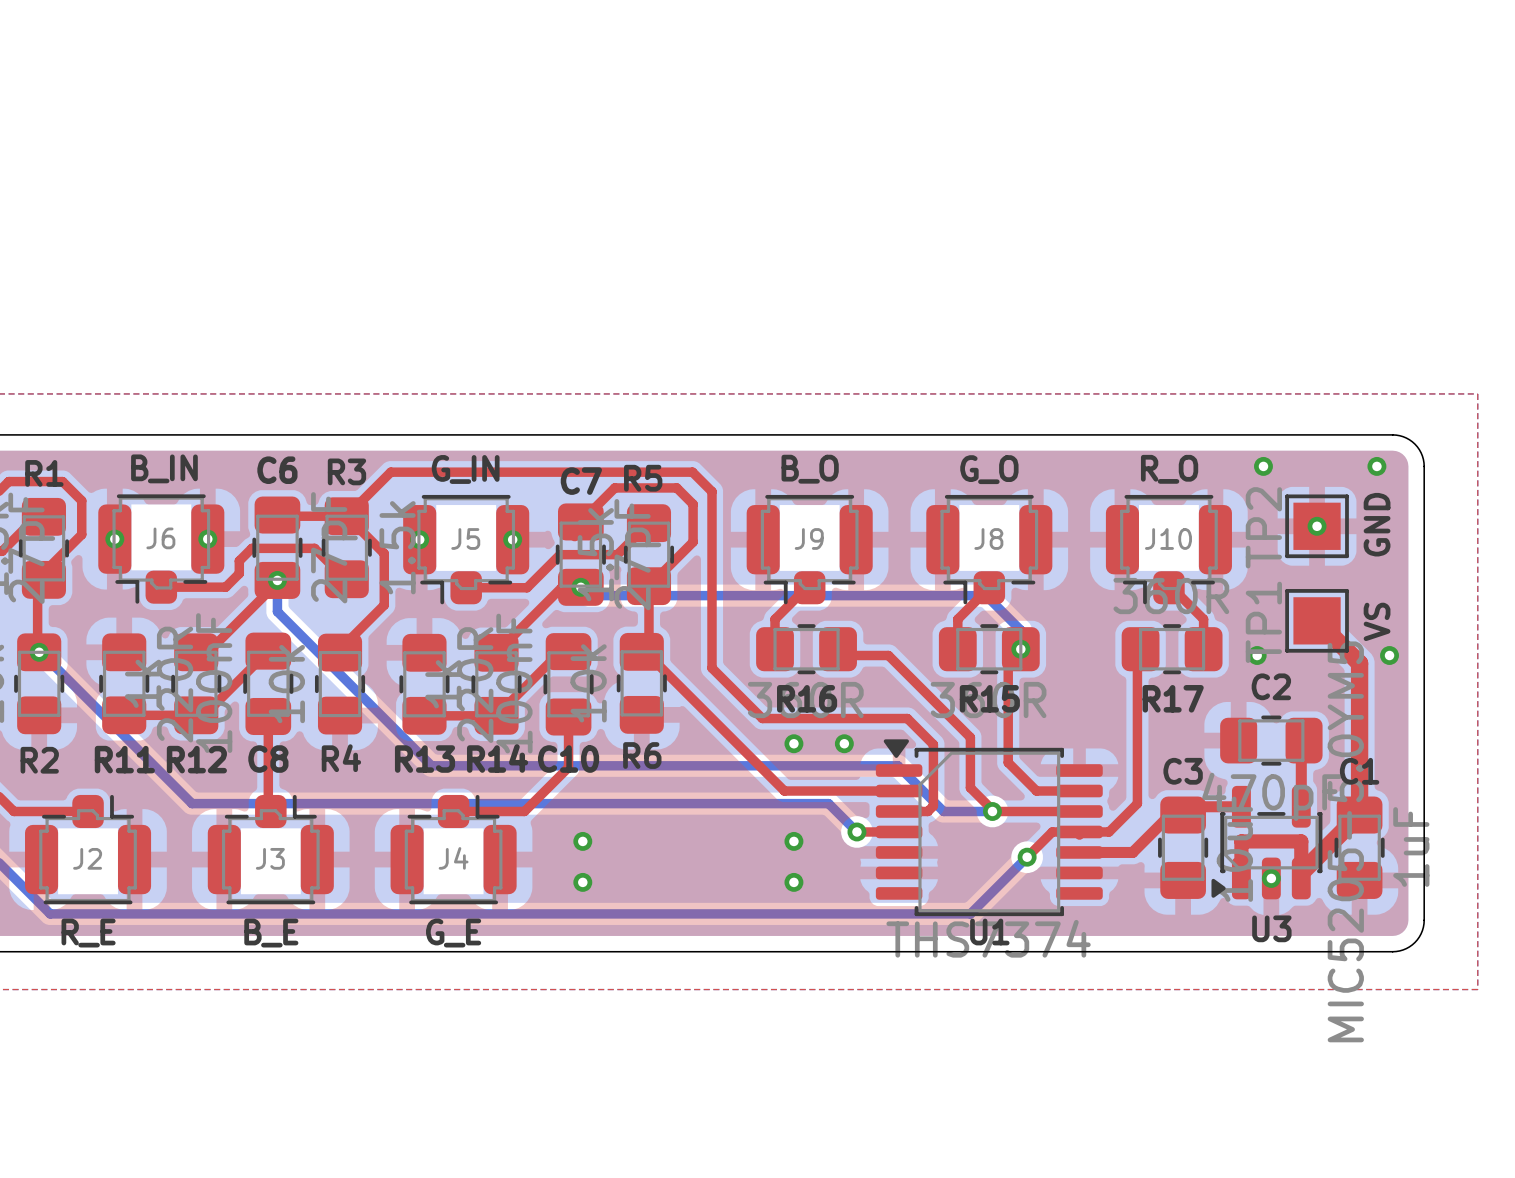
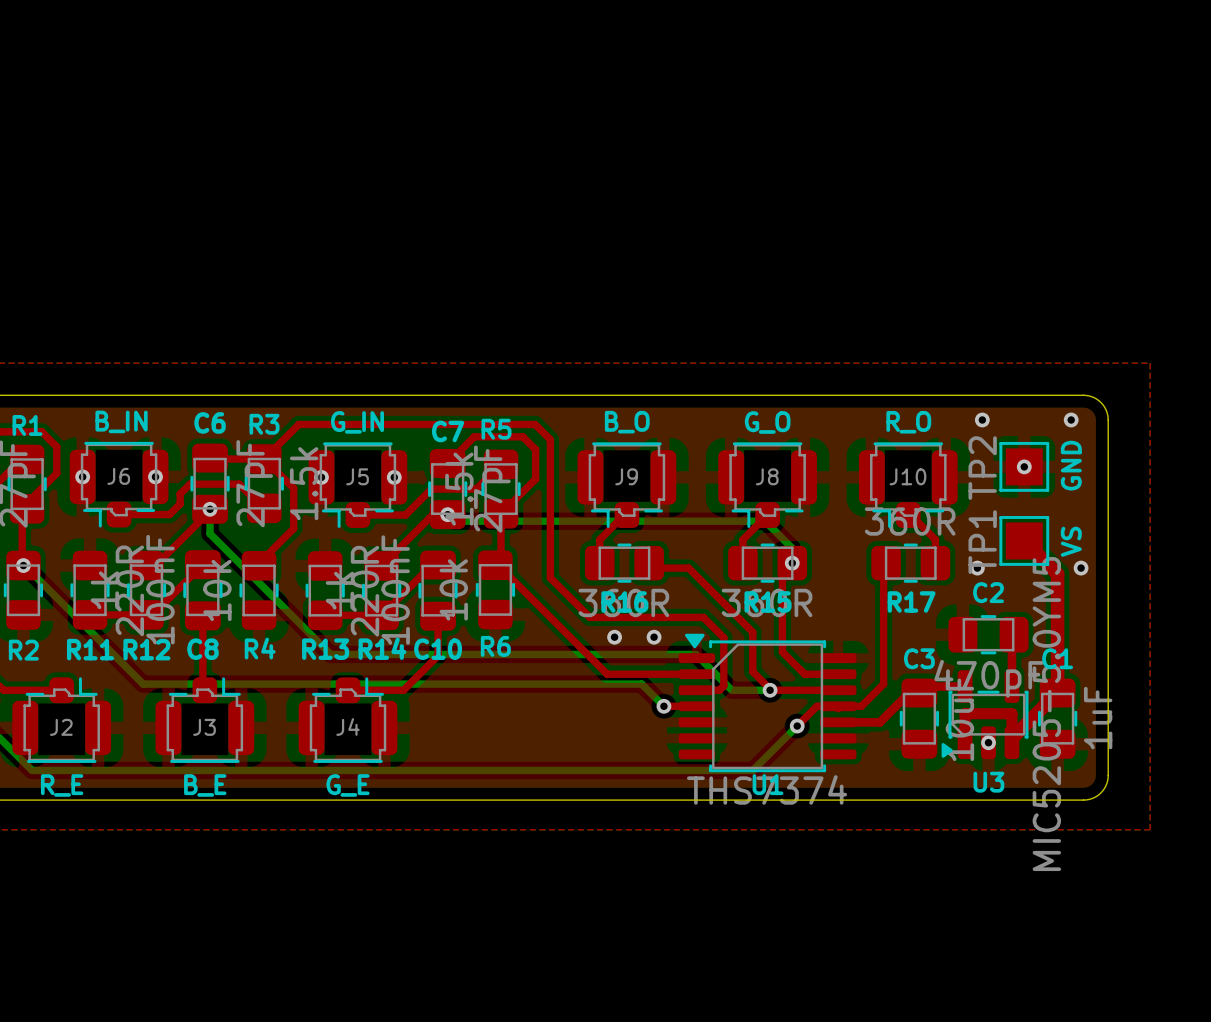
via: (582, 841) -> none
via: (793, 841) -> none
via: (582, 882) -> none
via: (793, 882) -> none

